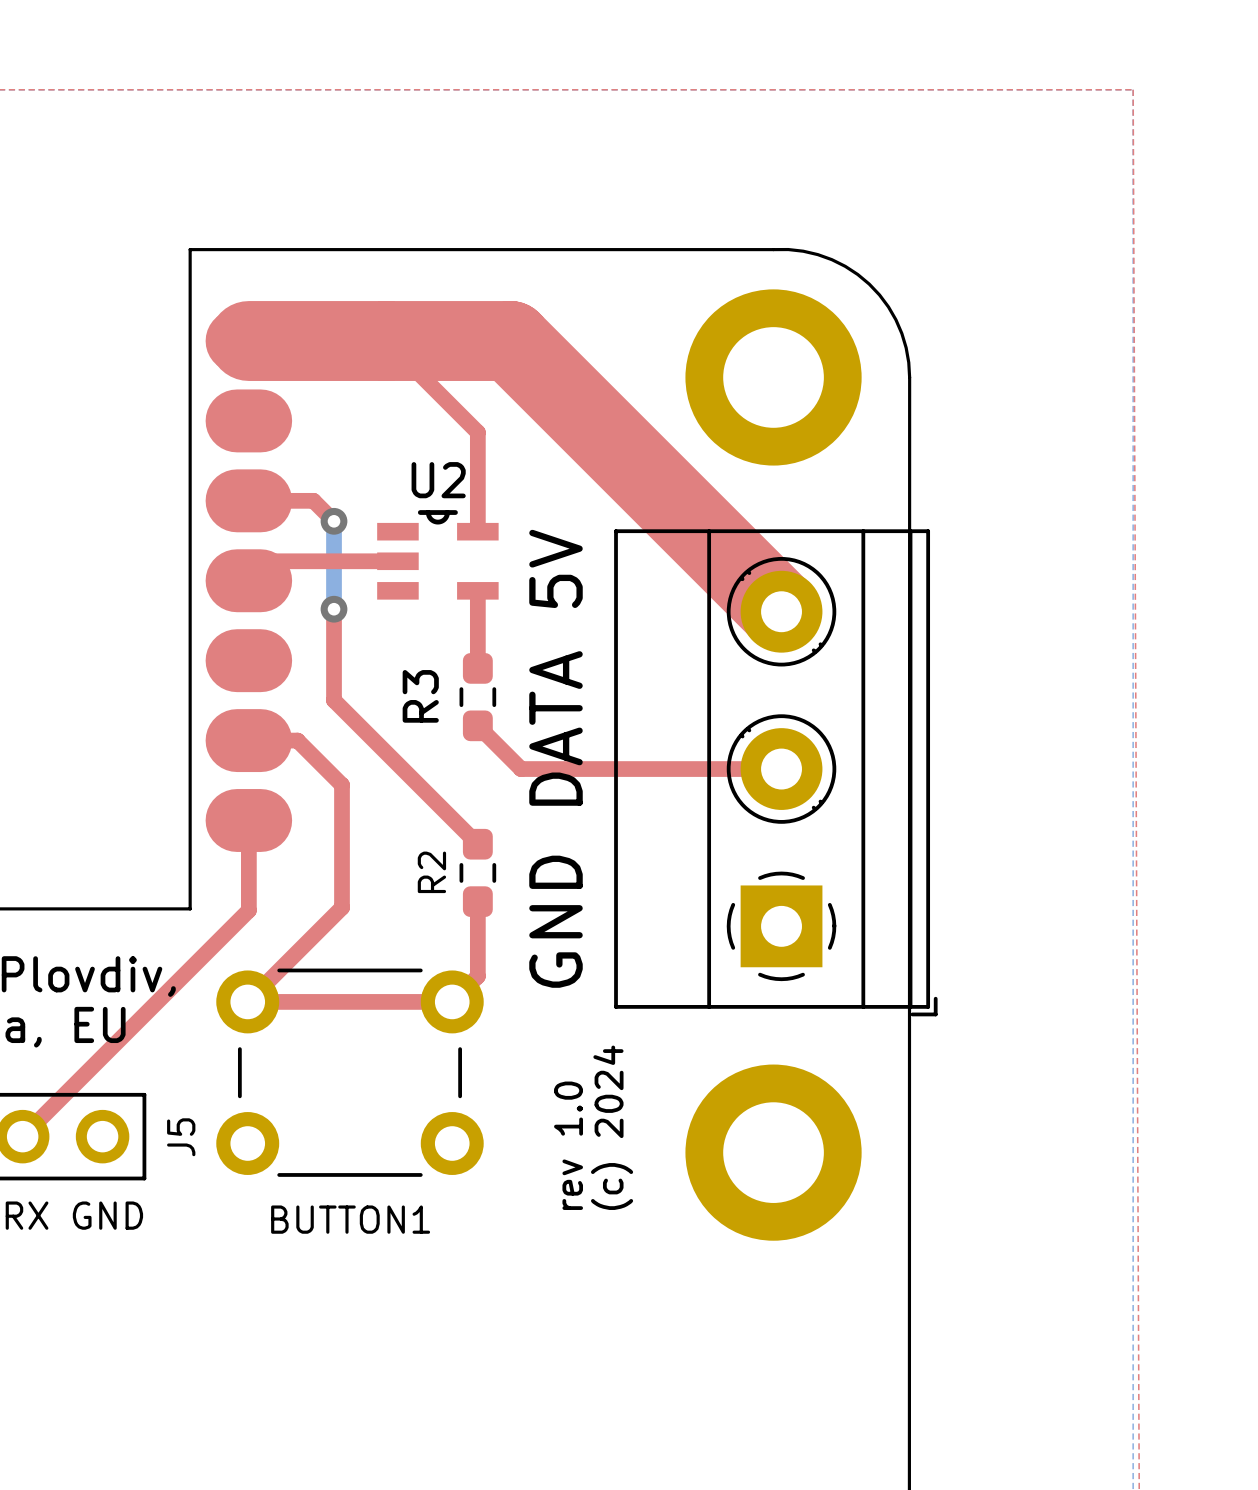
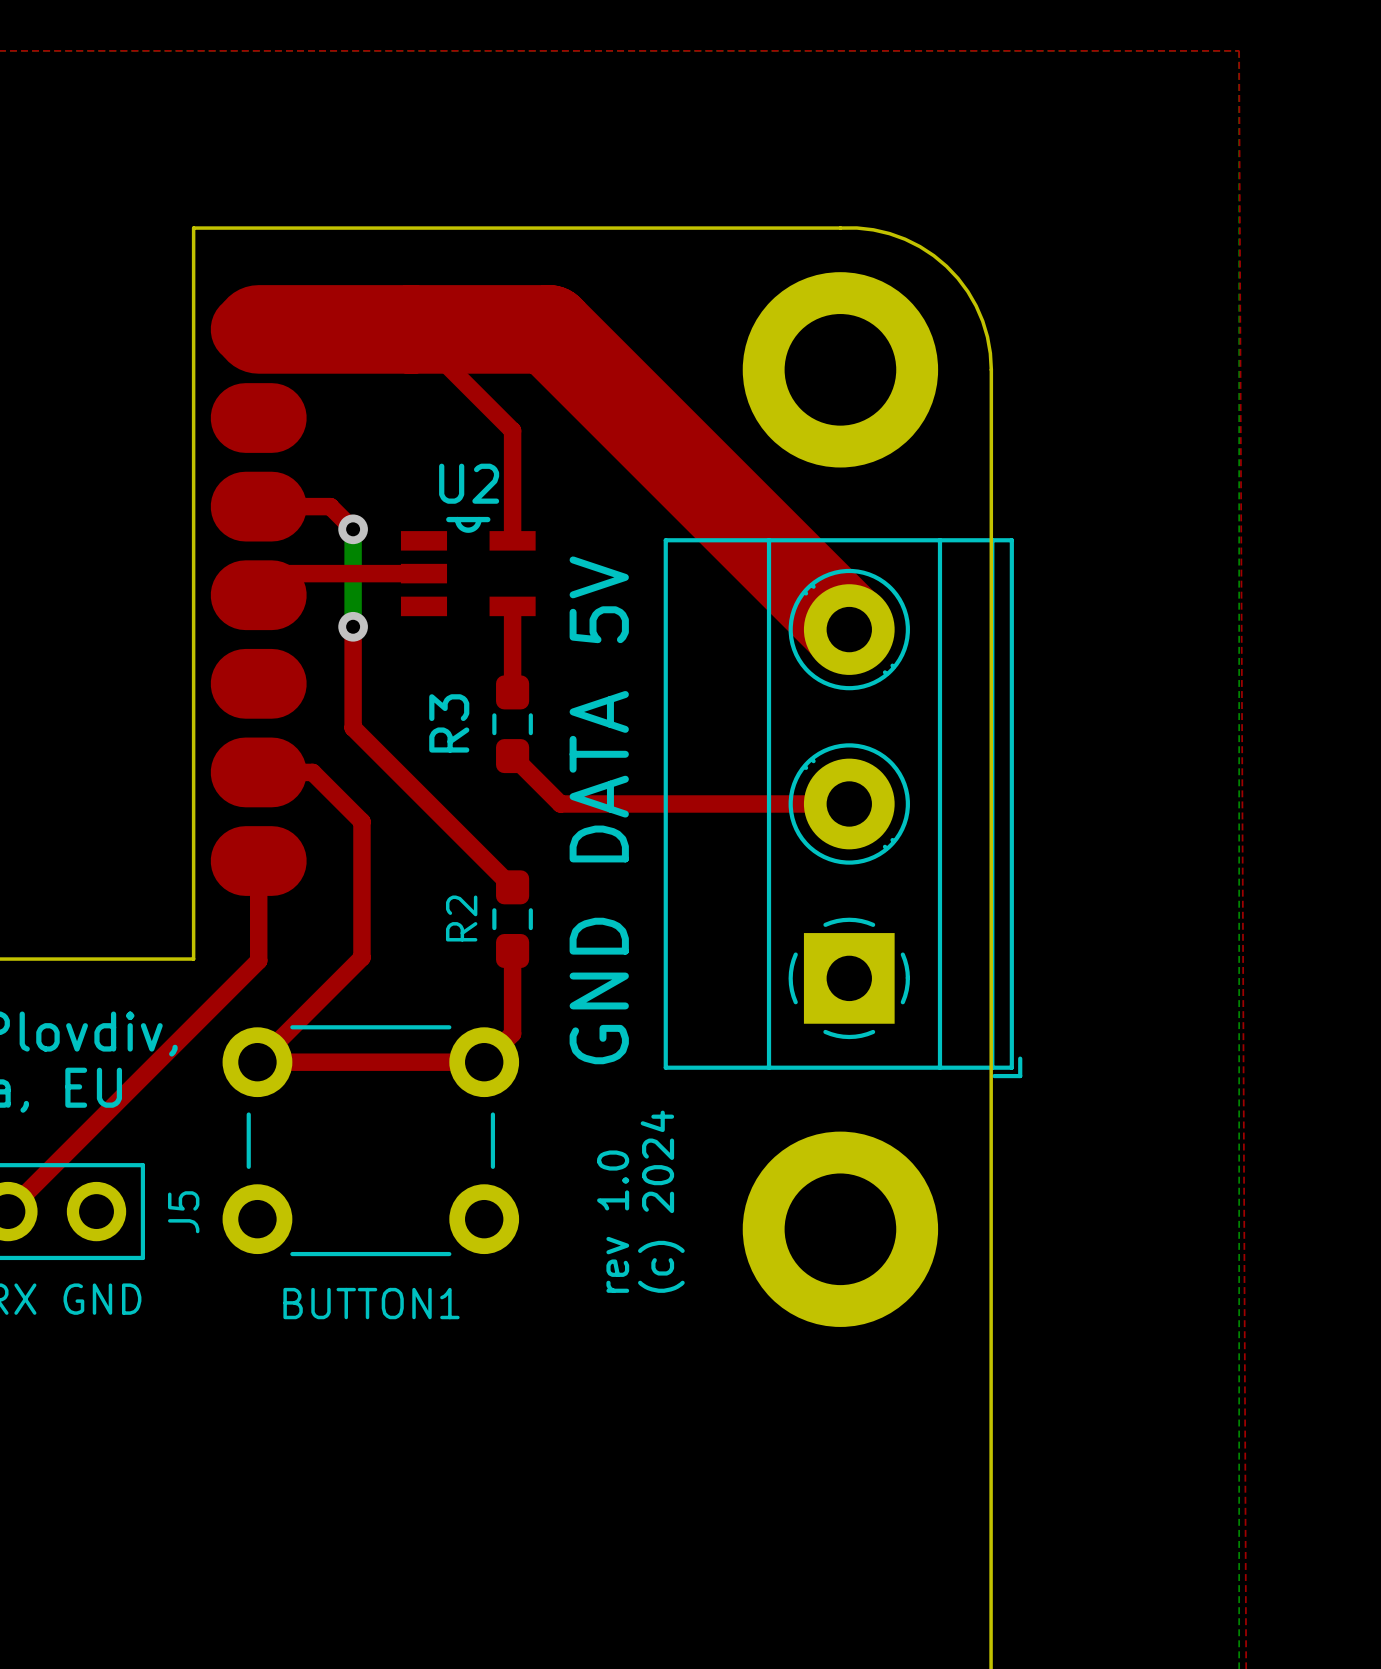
text position: GND DATA 5V (556, 758) -> GND DATA 5V (599, 810)

